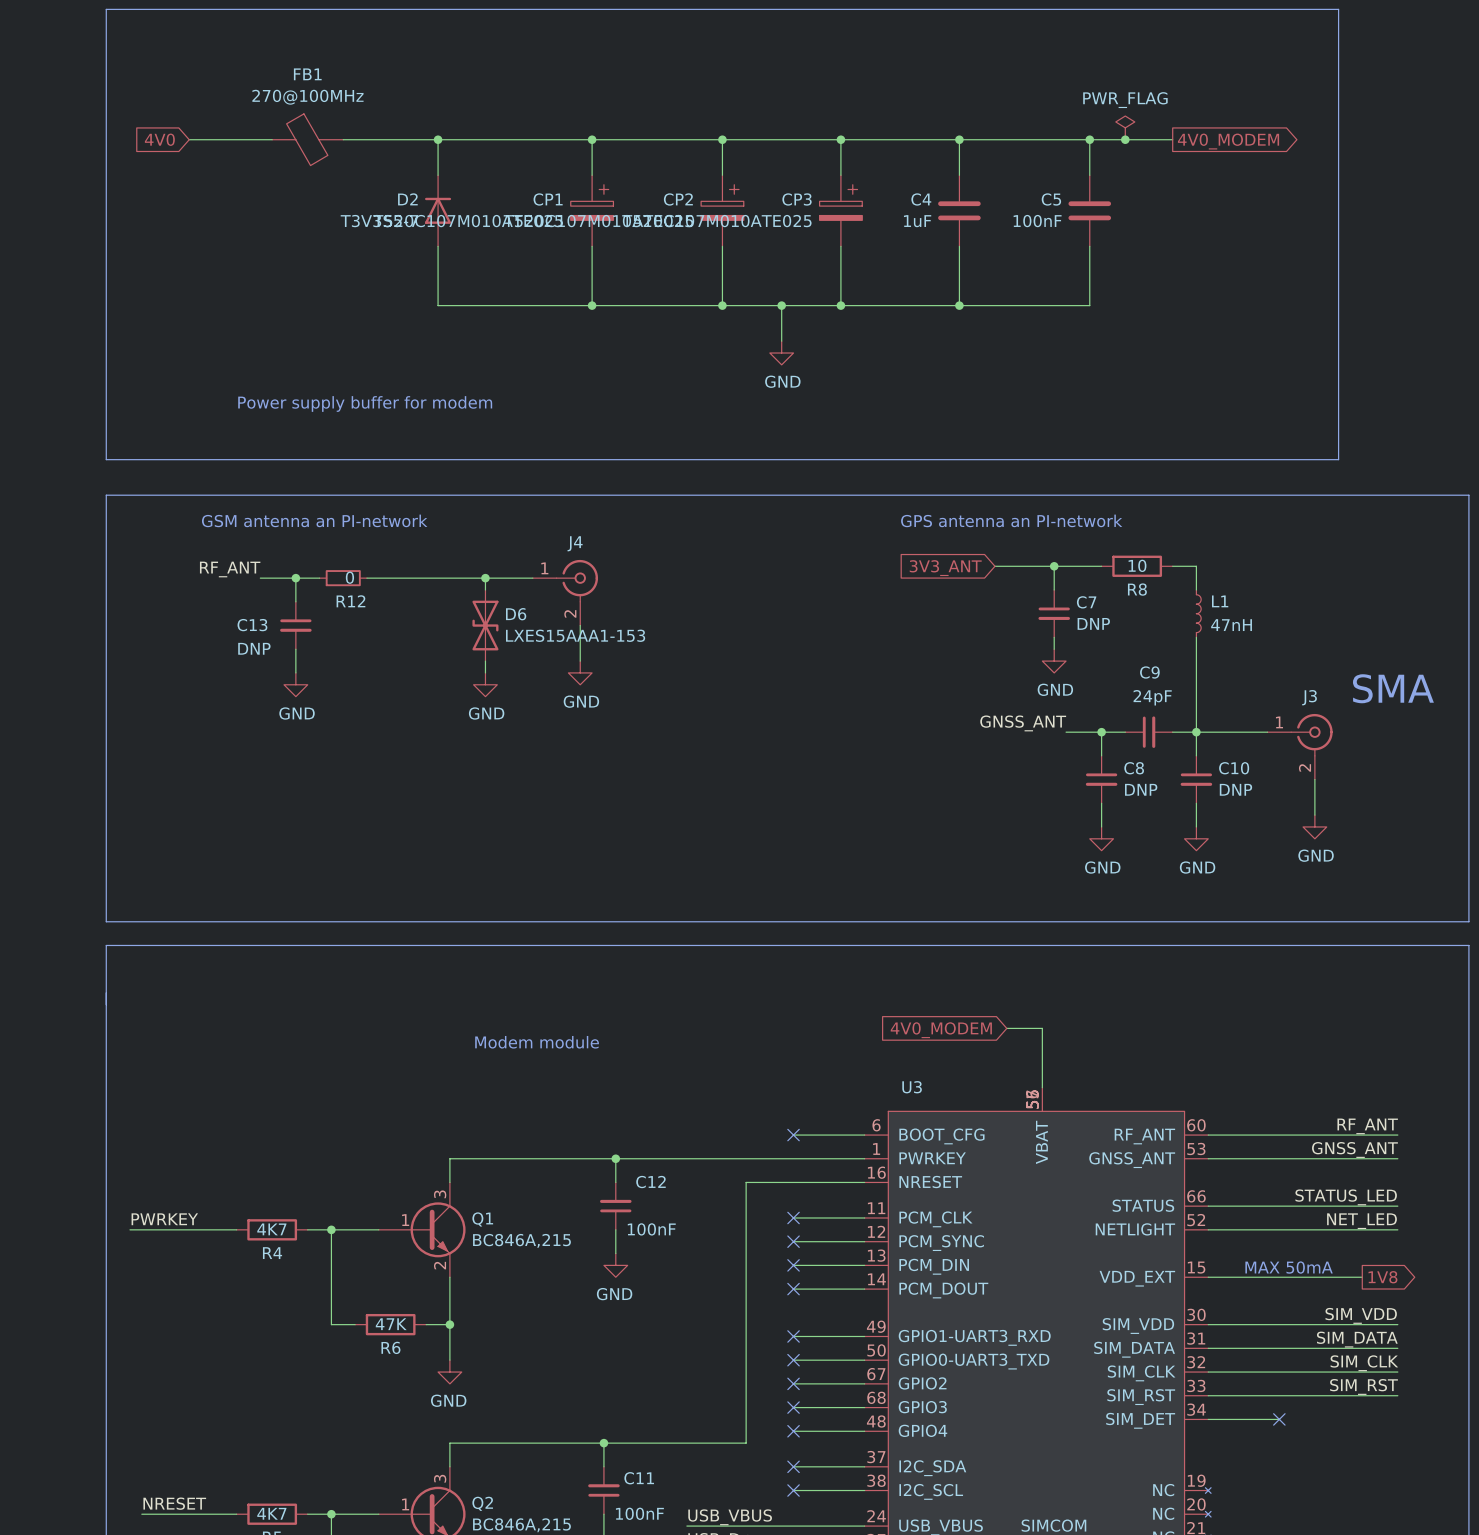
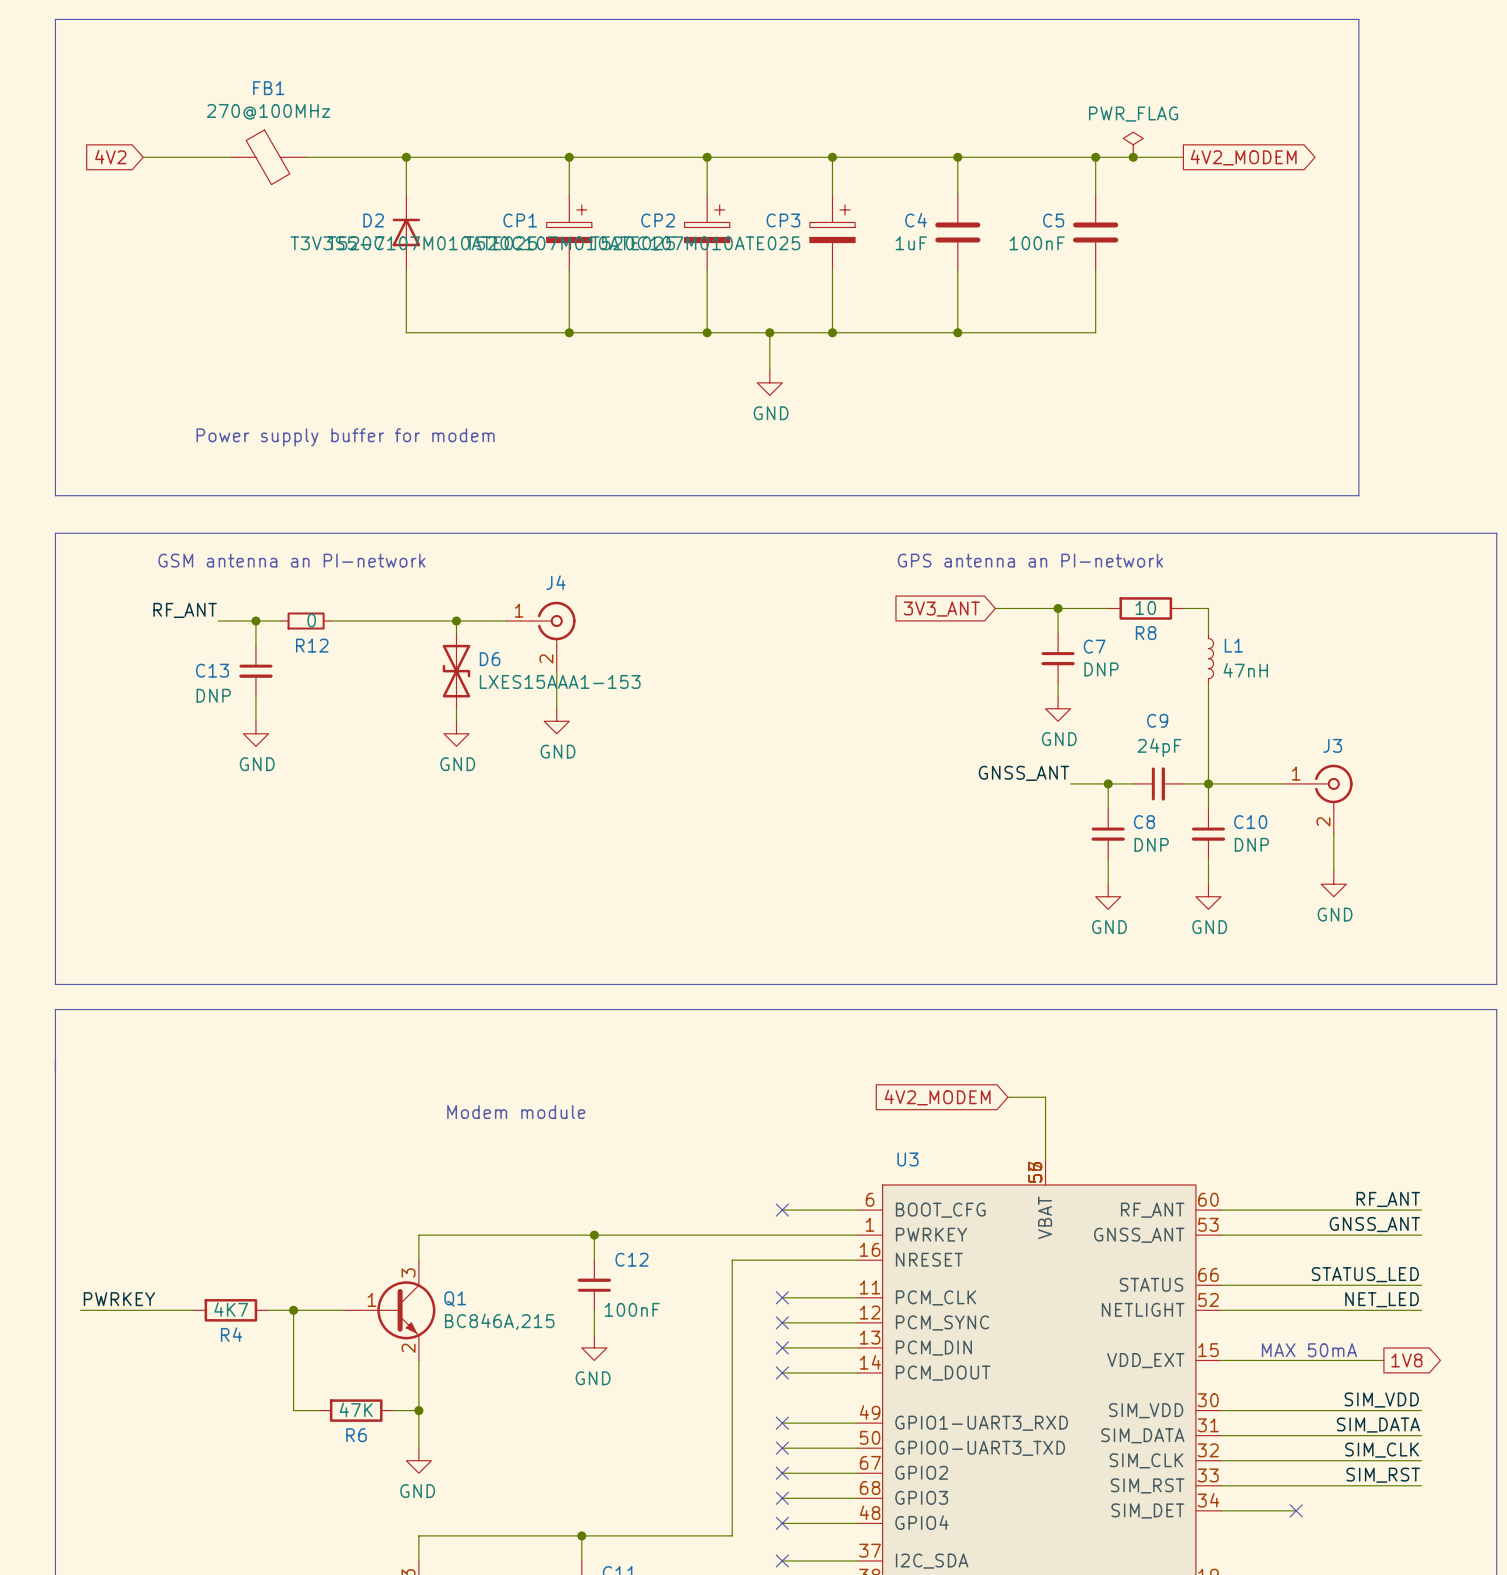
global label: 4V0 (159, 139) -> 4V2 (110, 157)
global label: 4V0_MODEM (1228, 141) -> 4V2_MODEM (1243, 157)
text: SMA (1393, 688) -> none
global label: 4V0_MODEM (941, 1030) -> 4V2_MODEM (937, 1097)

